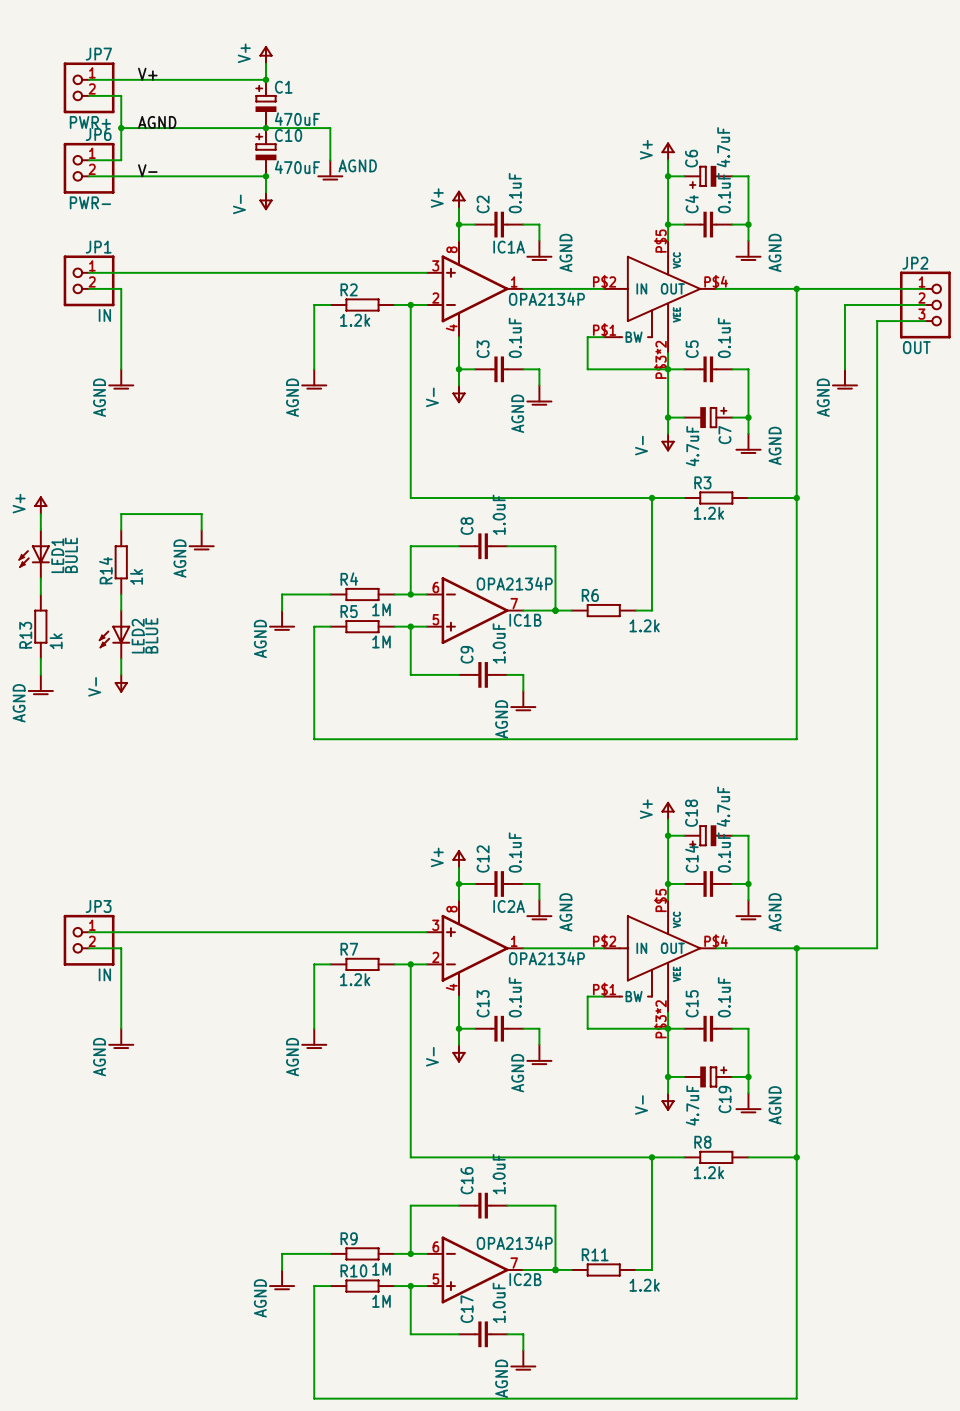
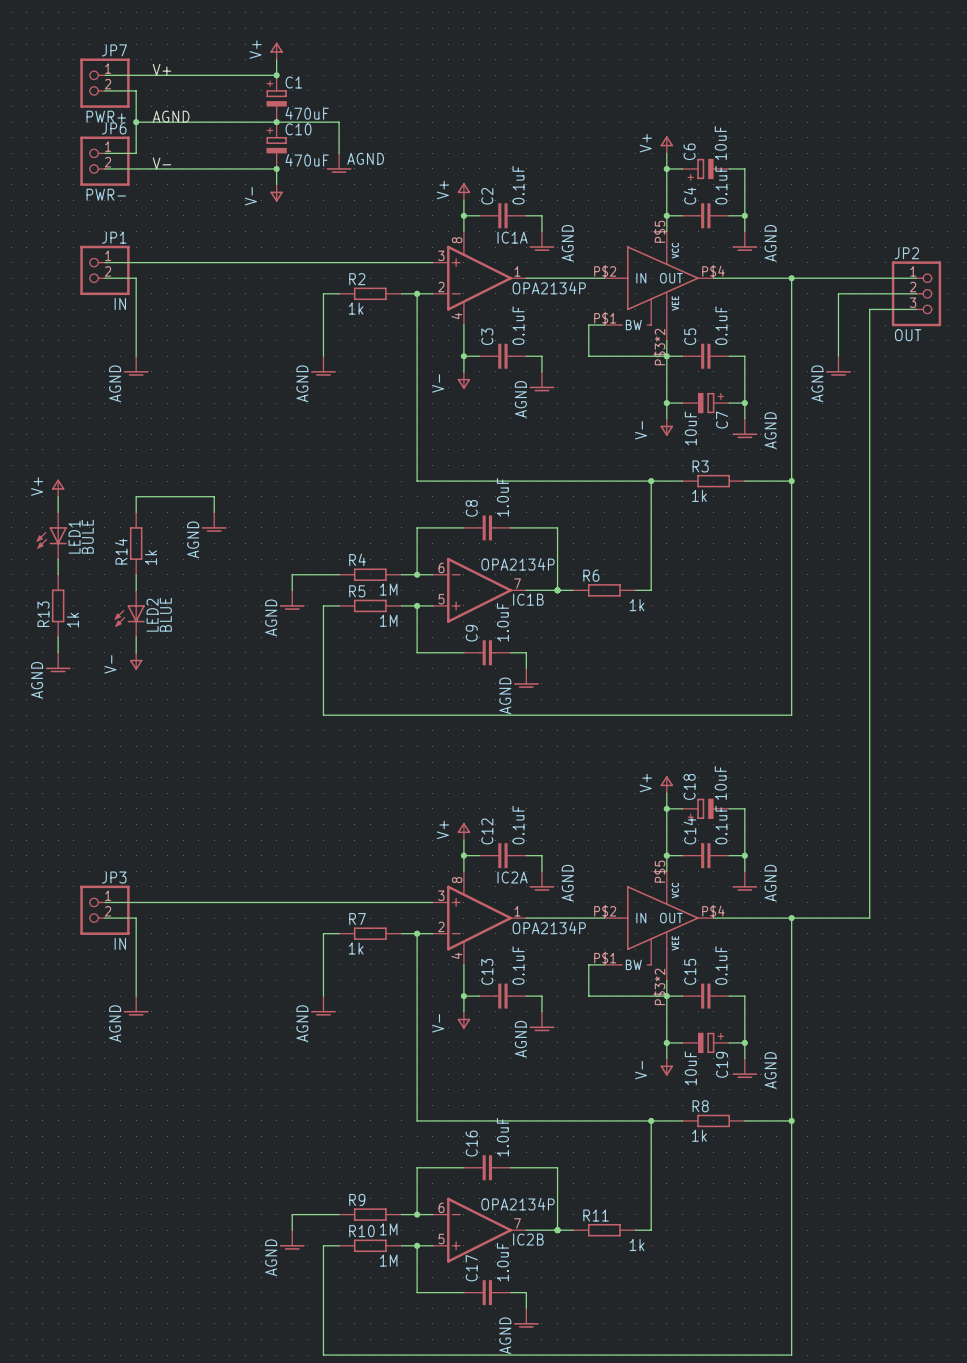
C6 value: 4.7uF (723, 147) -> 10uF (720, 143)
R2 value: 1.2k (355, 320) -> 1k (356, 308)
C7 value: 4.7uF (692, 446) -> 10uF (690, 428)
R3 value: 1.2k (708, 513) -> 1k (699, 495)
R6 value: 1.2k (644, 625) -> 1k (637, 605)
C18 value: 4.7uF (723, 806) -> 10uF (720, 782)
R7 value: 1.2k (355, 979) -> 1k (356, 948)
C19 value: 4.7uF (692, 1105) -> 10uF (690, 1068)
R8 value: 1.2k (708, 1172) -> 1k (699, 1135)
R11 value: 1.2k (644, 1285) -> 1k (637, 1245)

